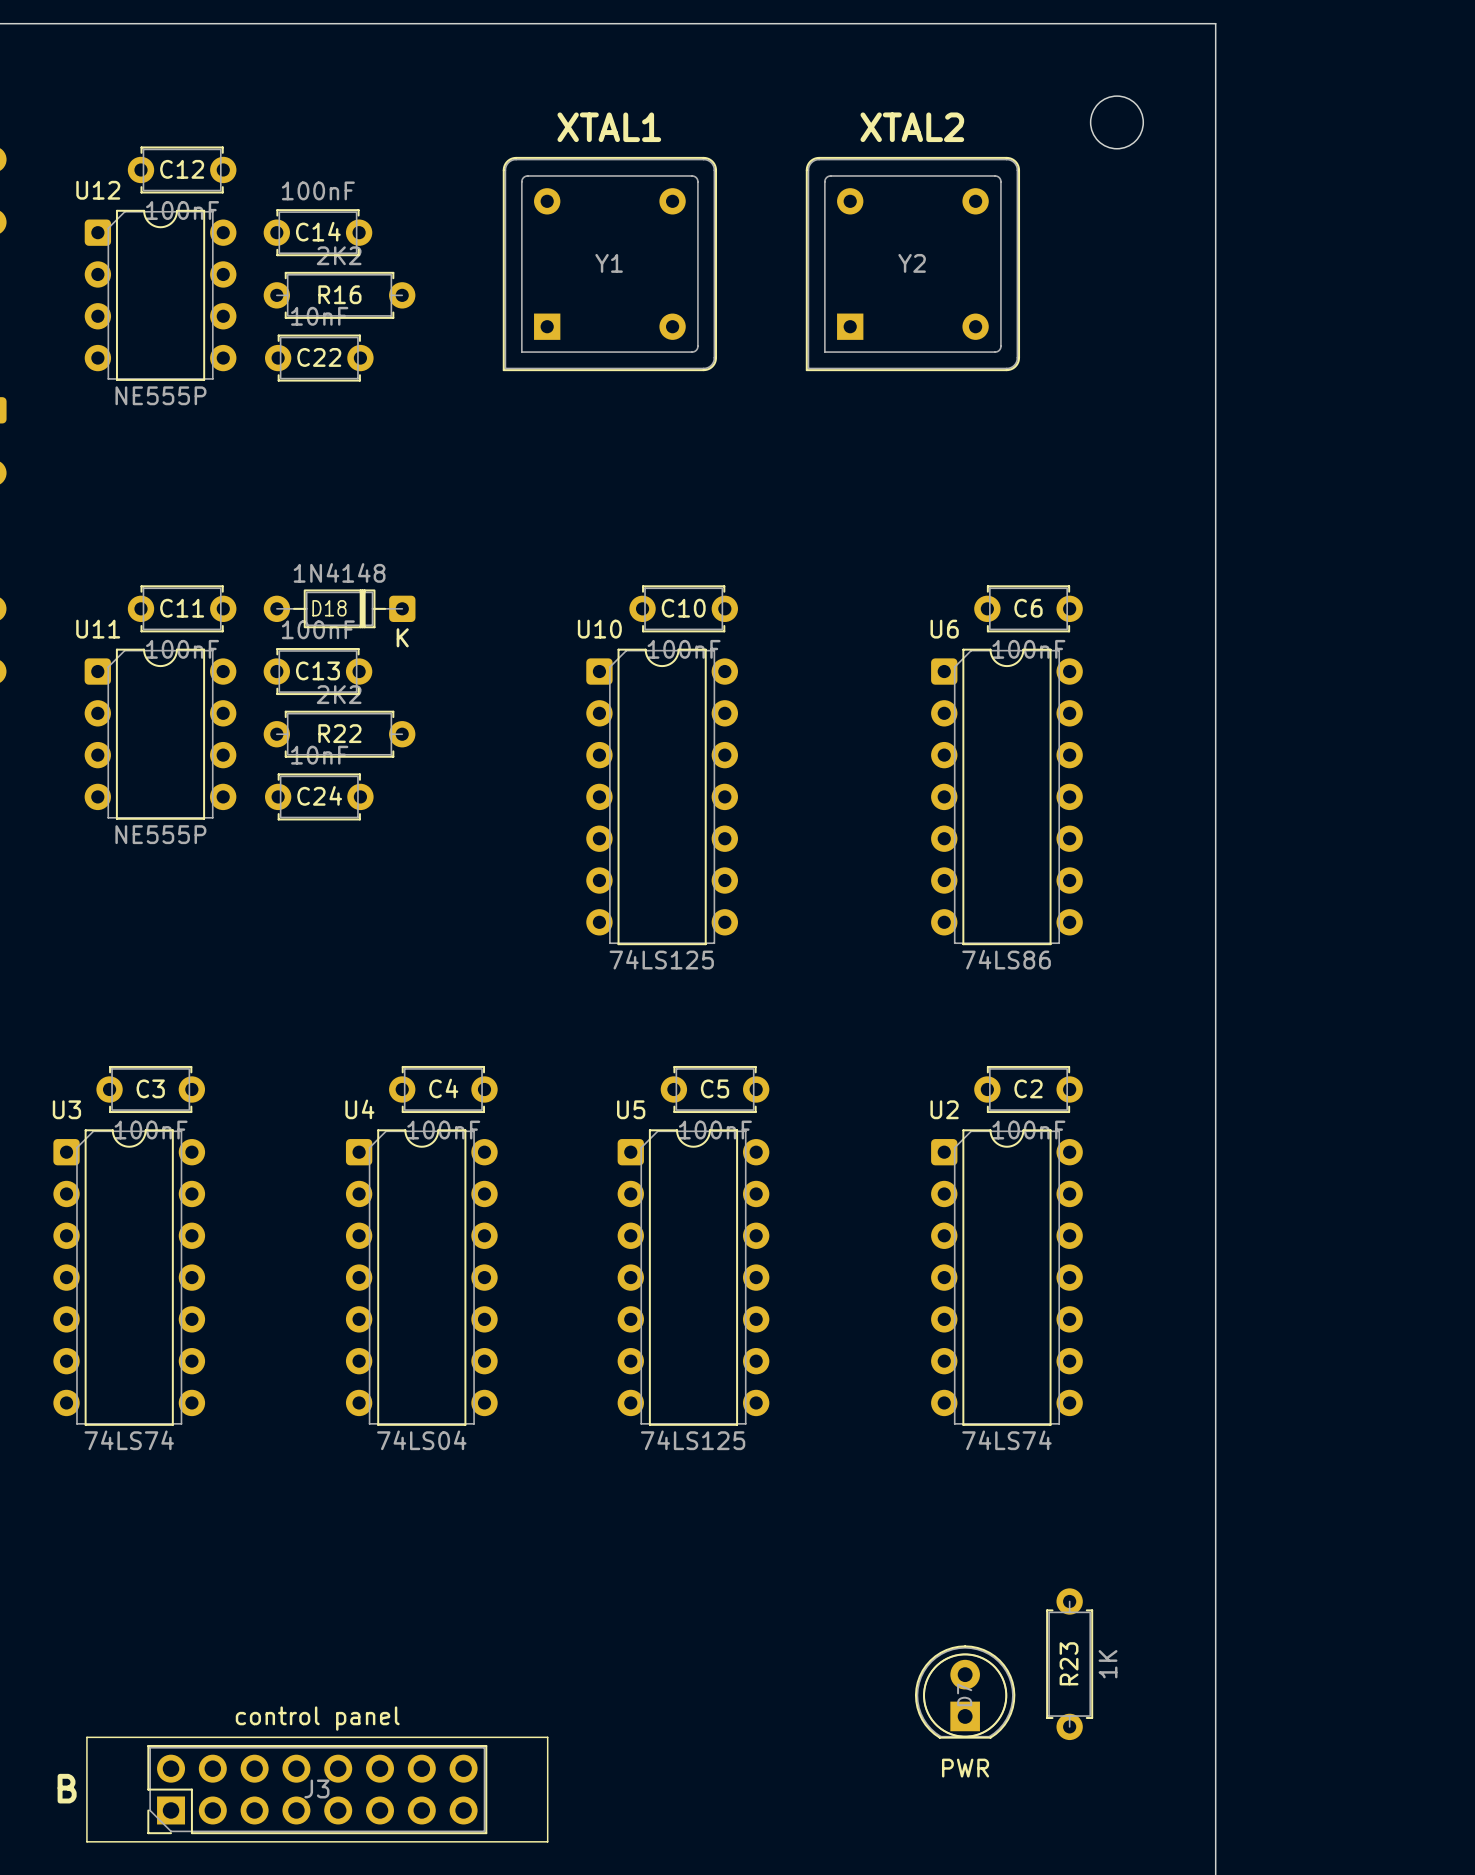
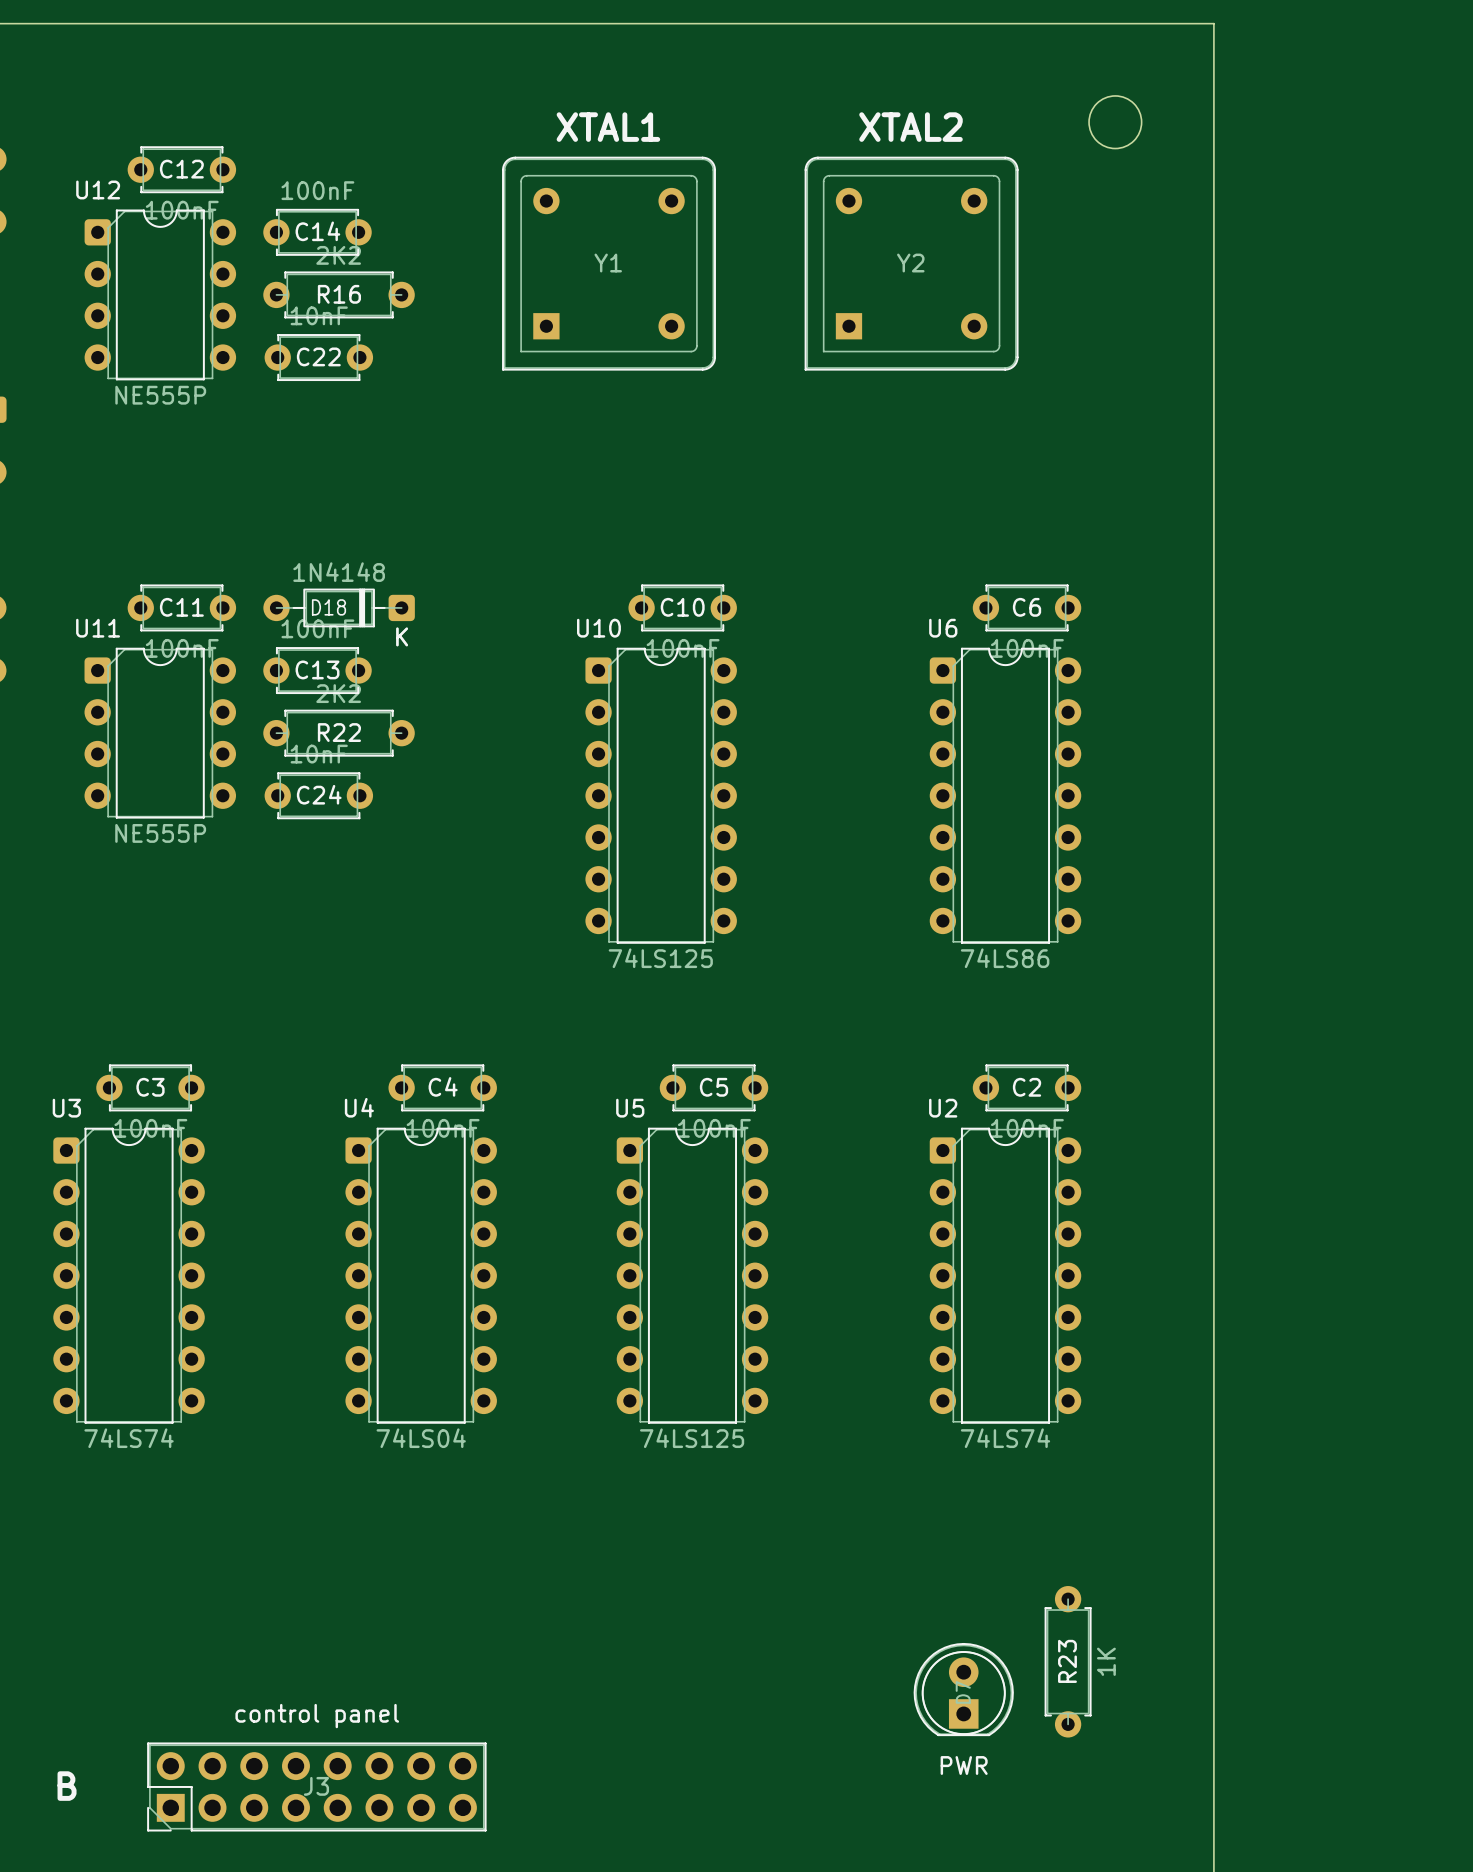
line: (86, 1737) (547, 1737) (547, 1841) (86, 1841) (86, 1737) -> none

